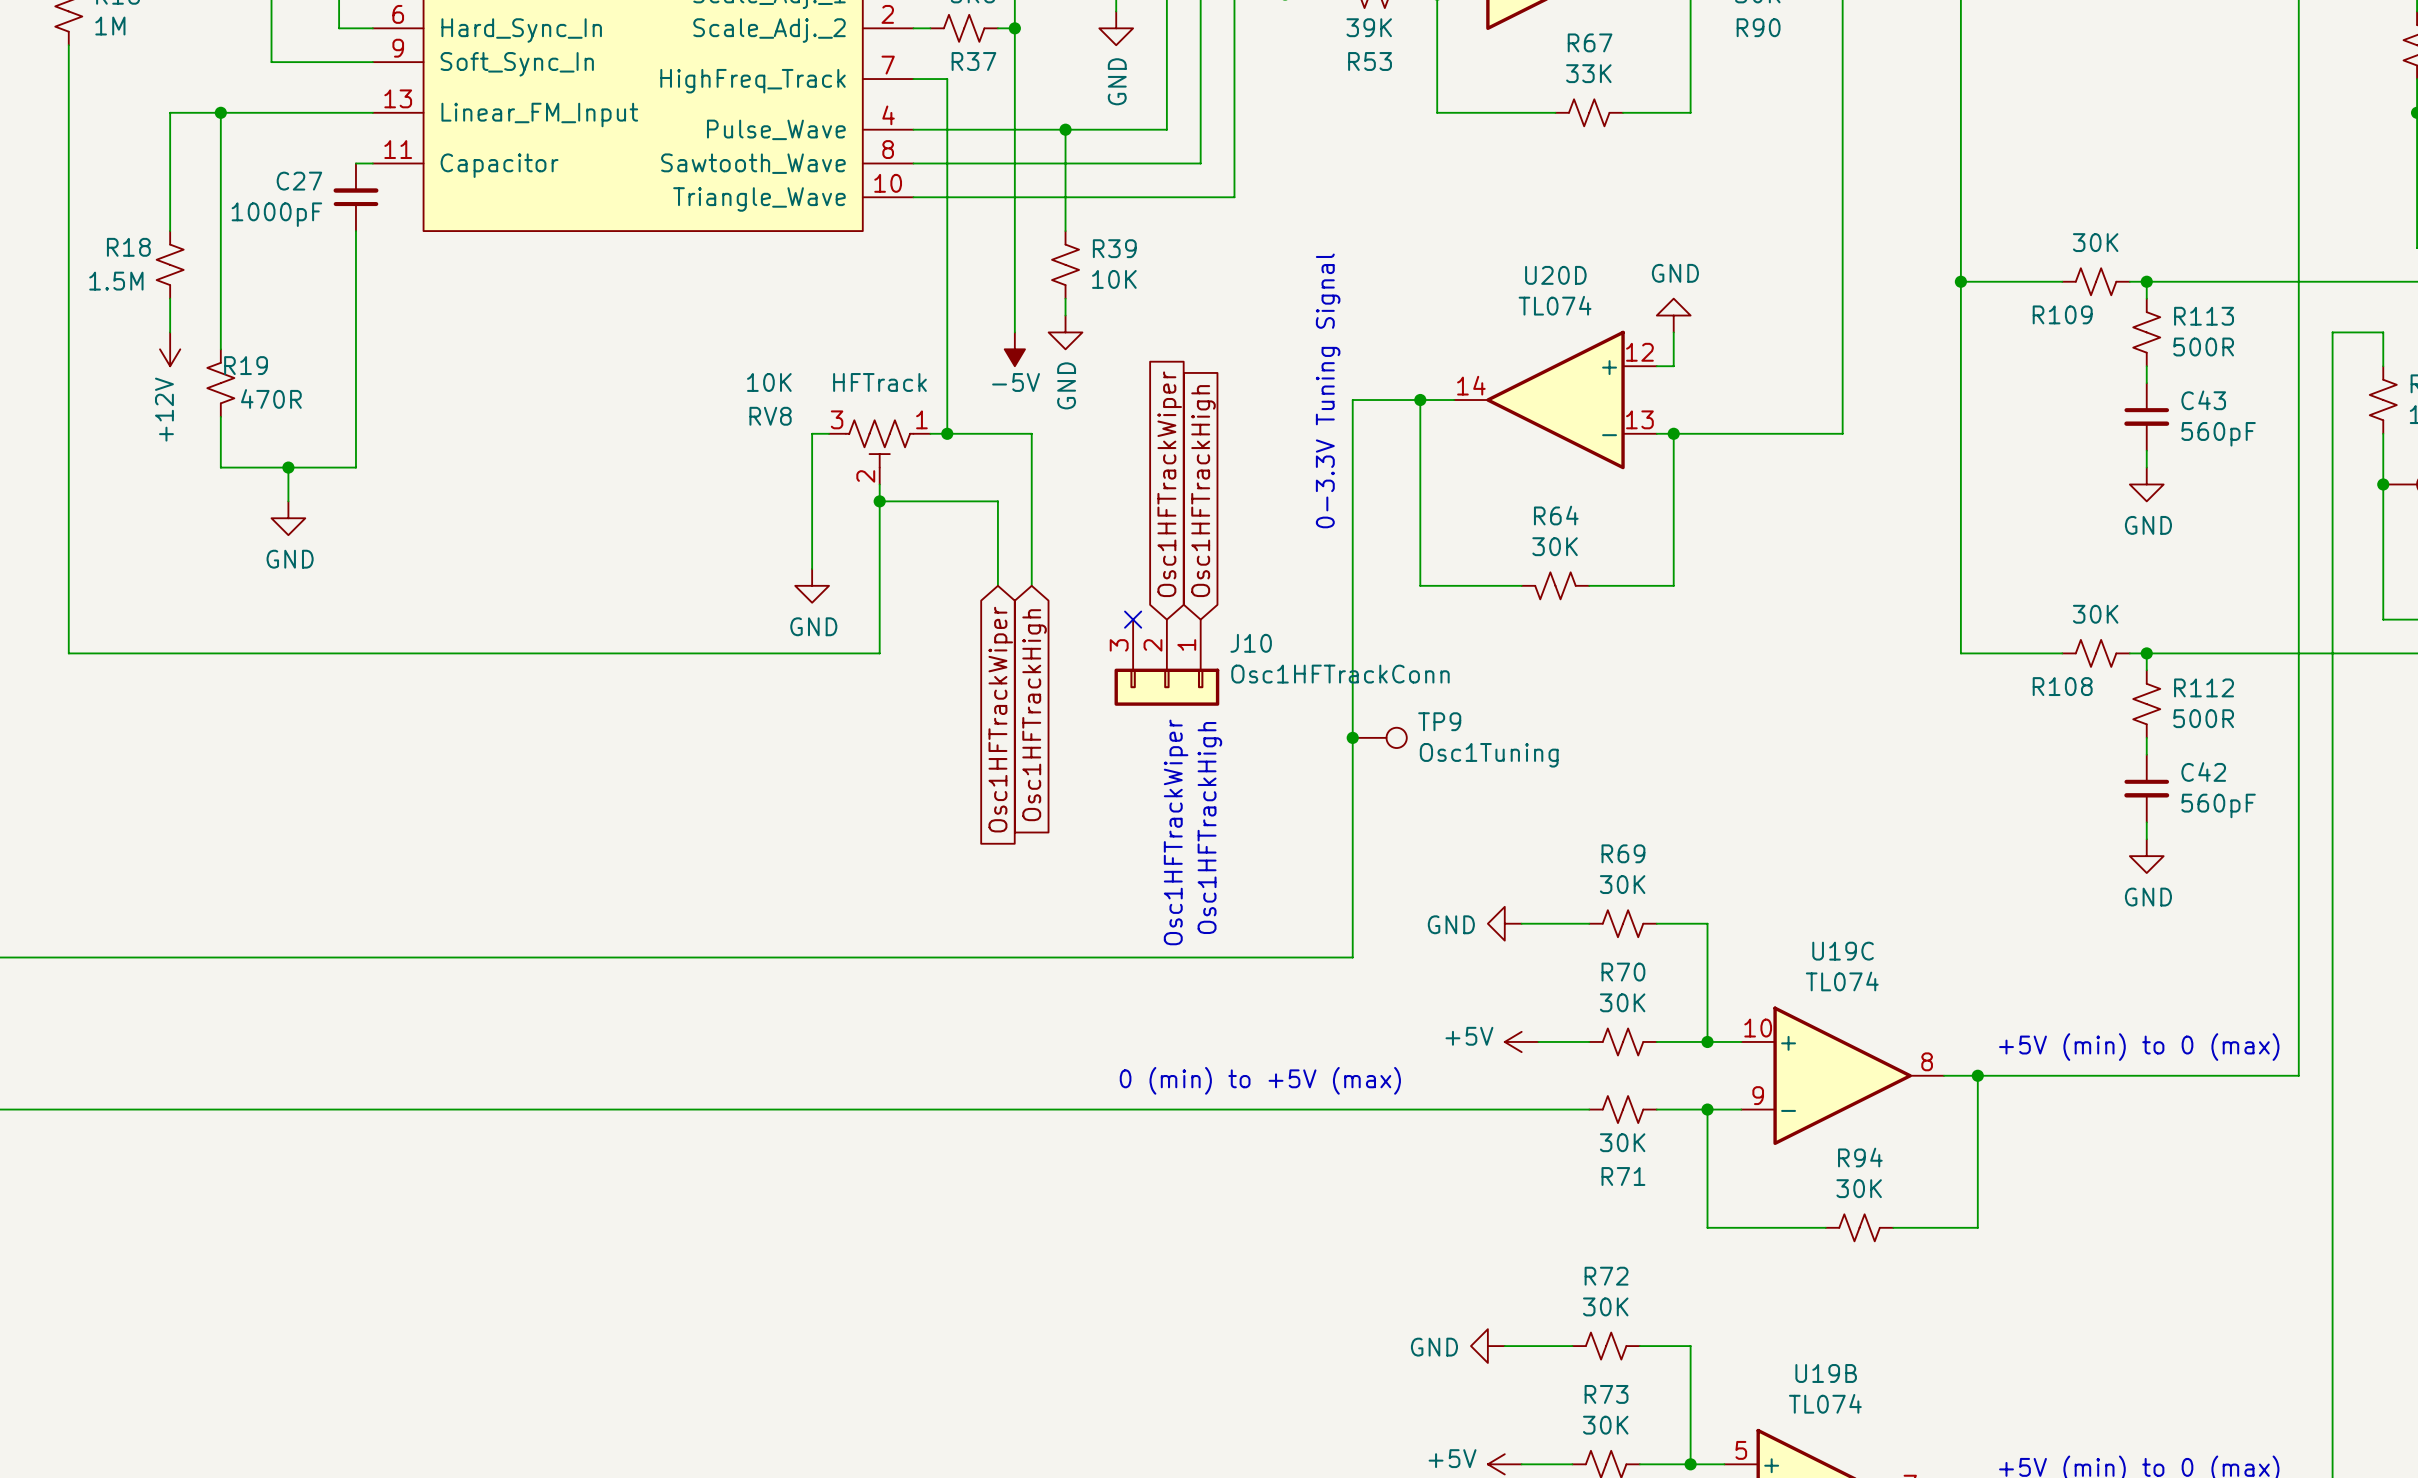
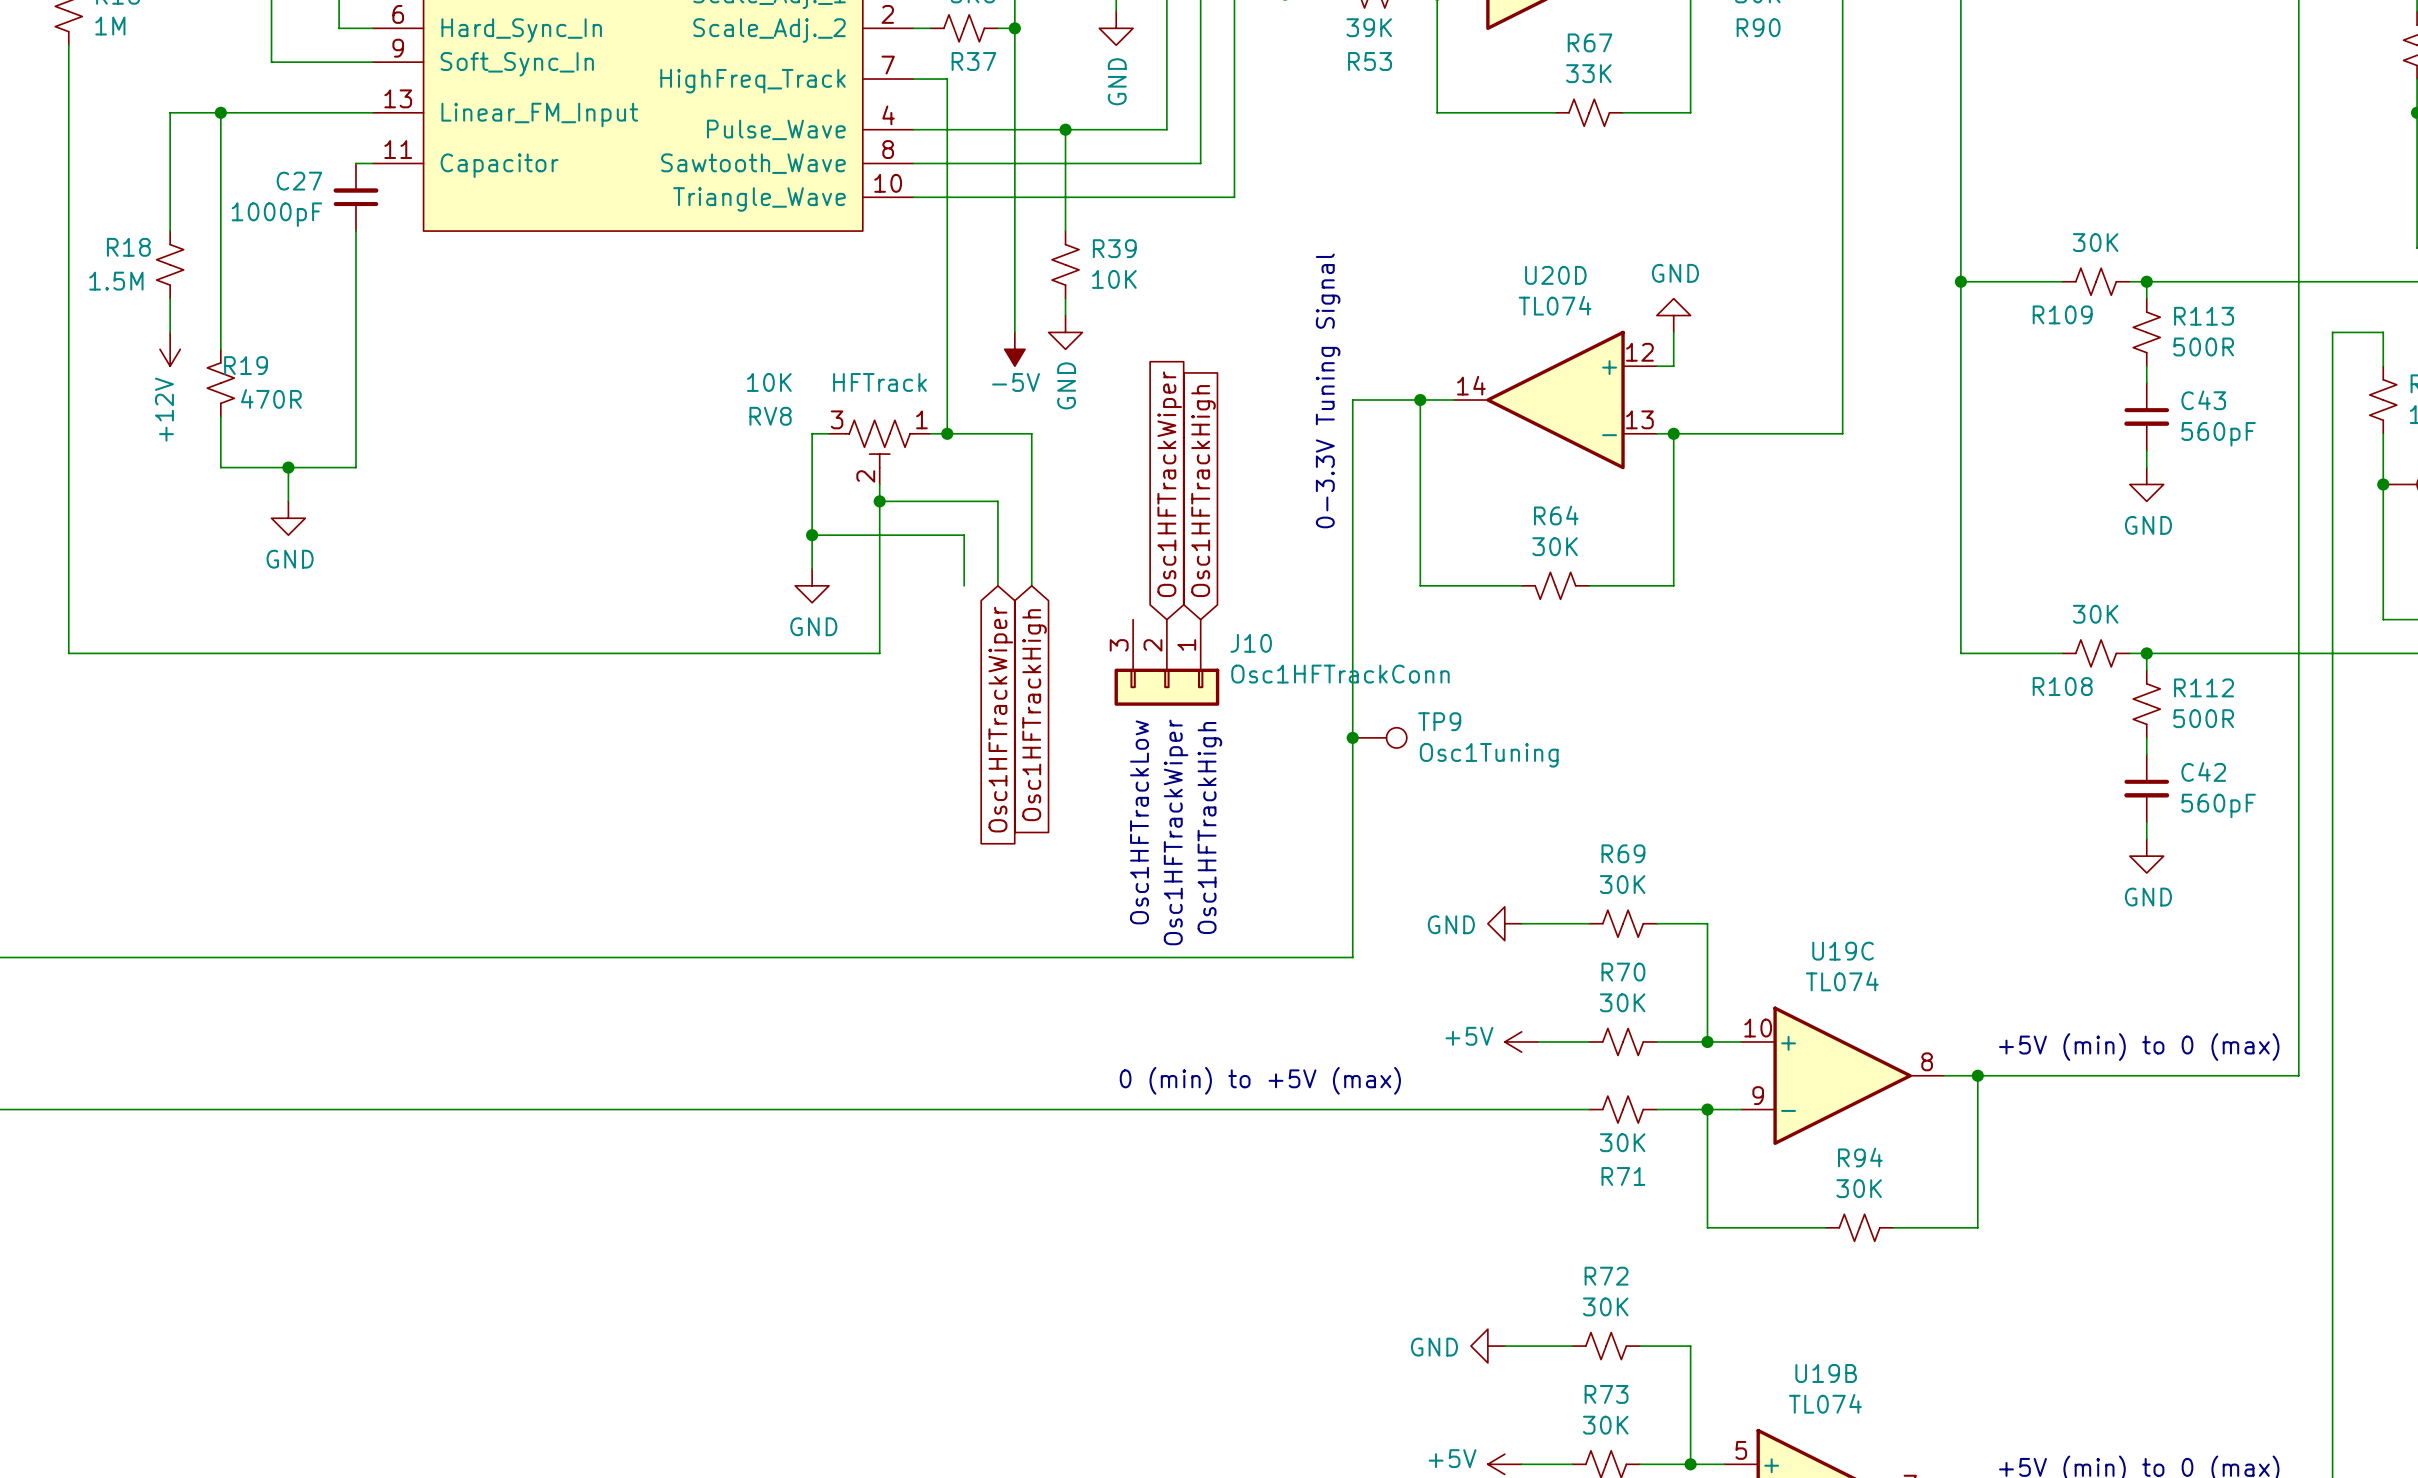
wire: none -> (812, 535) (964, 535) (964, 585)
junction: none -> (812, 535)
no-connect mark: (1133, 619) -> none
text: none -> Osc1HFTrackLow (1139, 822)

